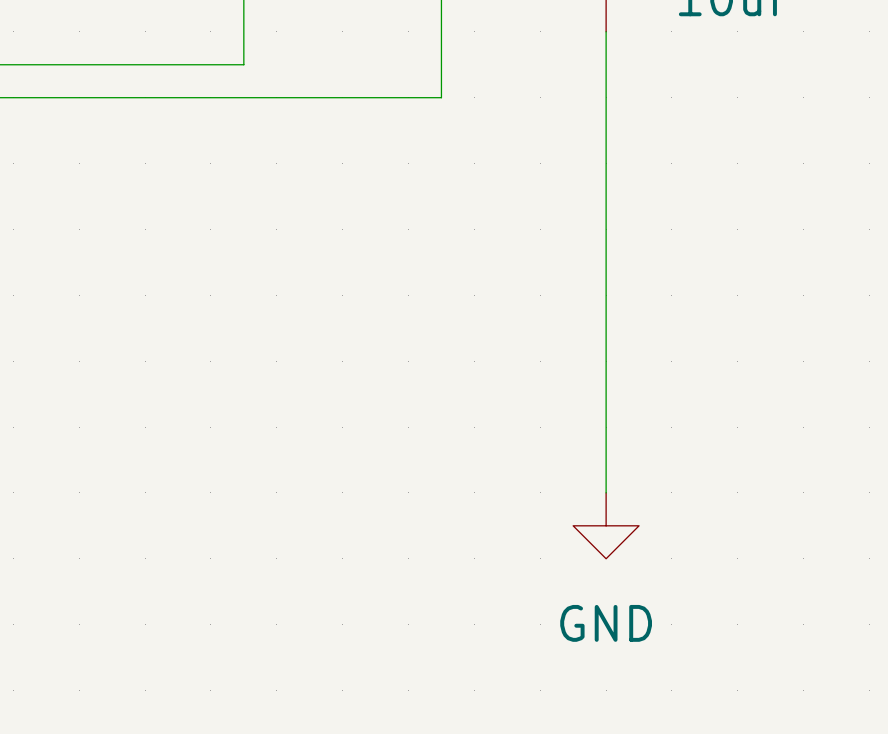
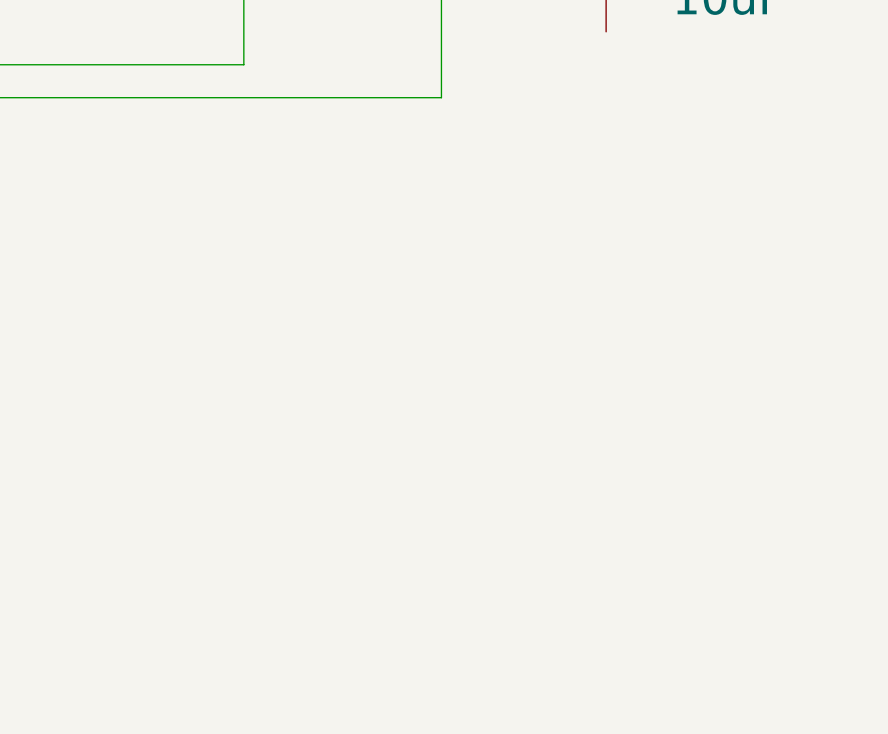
wire: (606, 31) (606, 492) -> none
power symbol: GND (606, 525) -> none

